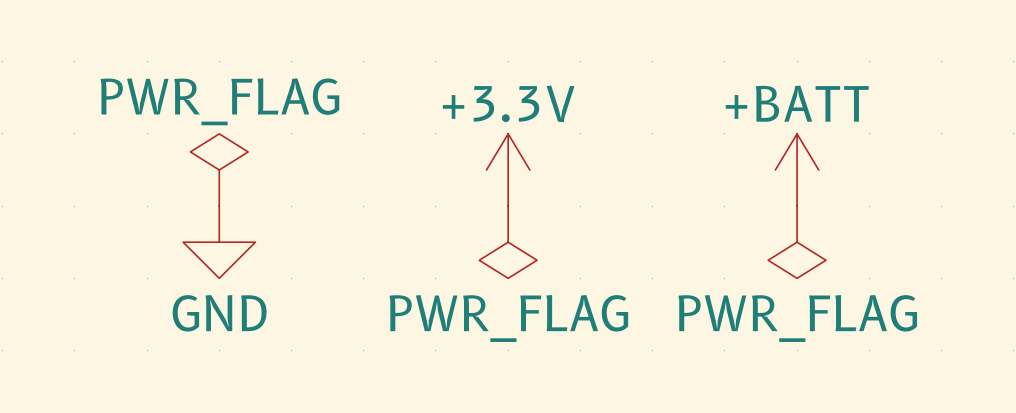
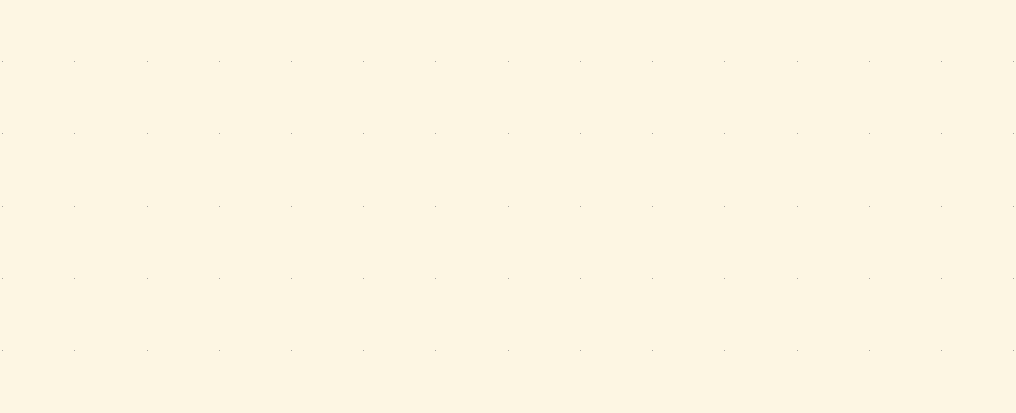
power symbol: PWR_FLAG (219, 169) -> none
power symbol: +3.3V (508, 169) -> none
power symbol: +BATT (797, 169) -> none
power symbol: GND (219, 242) -> none
power symbol: PWR_FLAG (508, 242) -> none
power symbol: PWR_FLAG (797, 242) -> none

